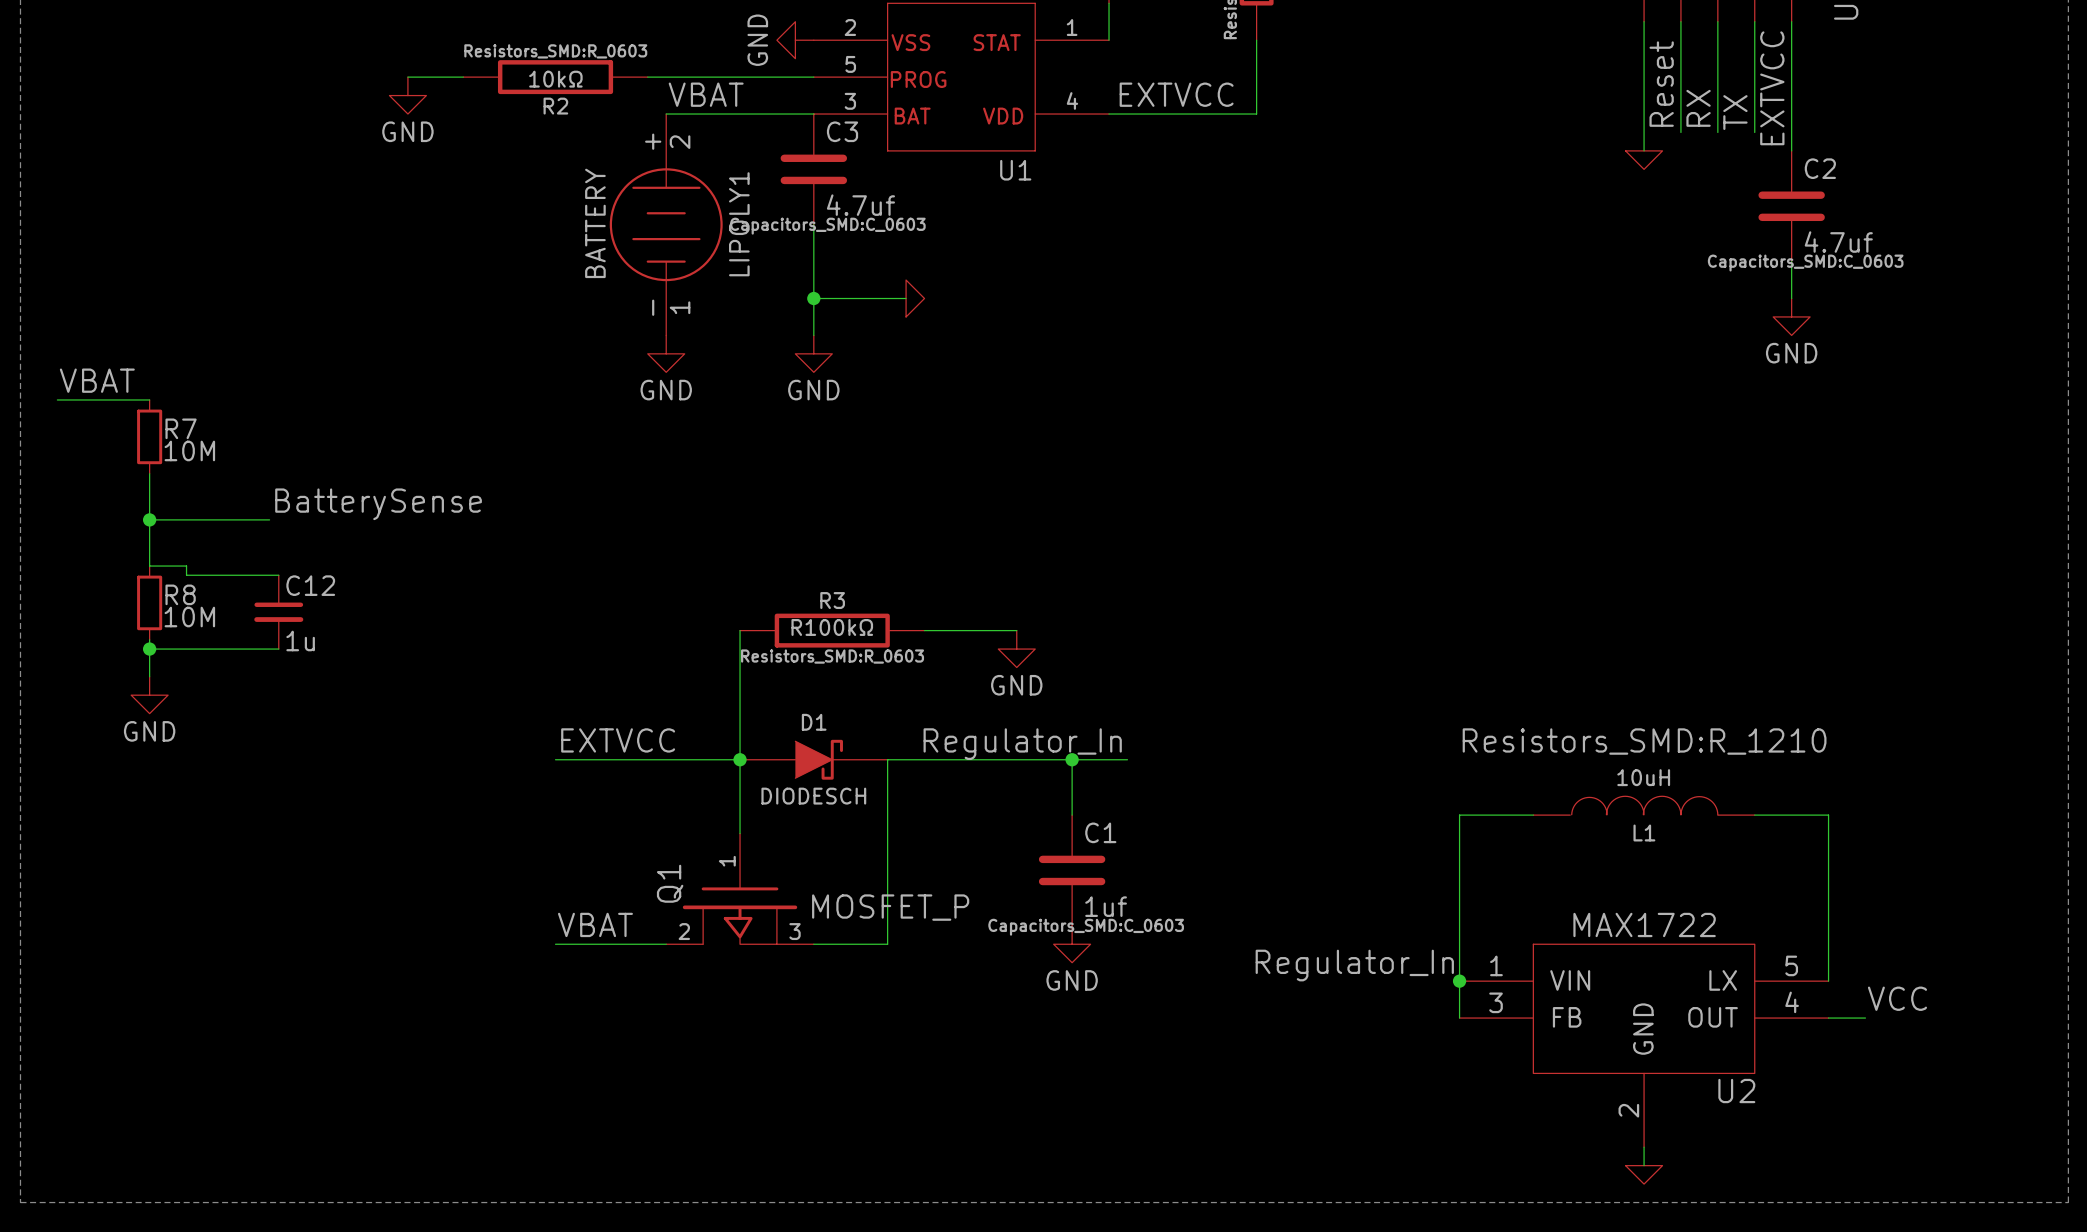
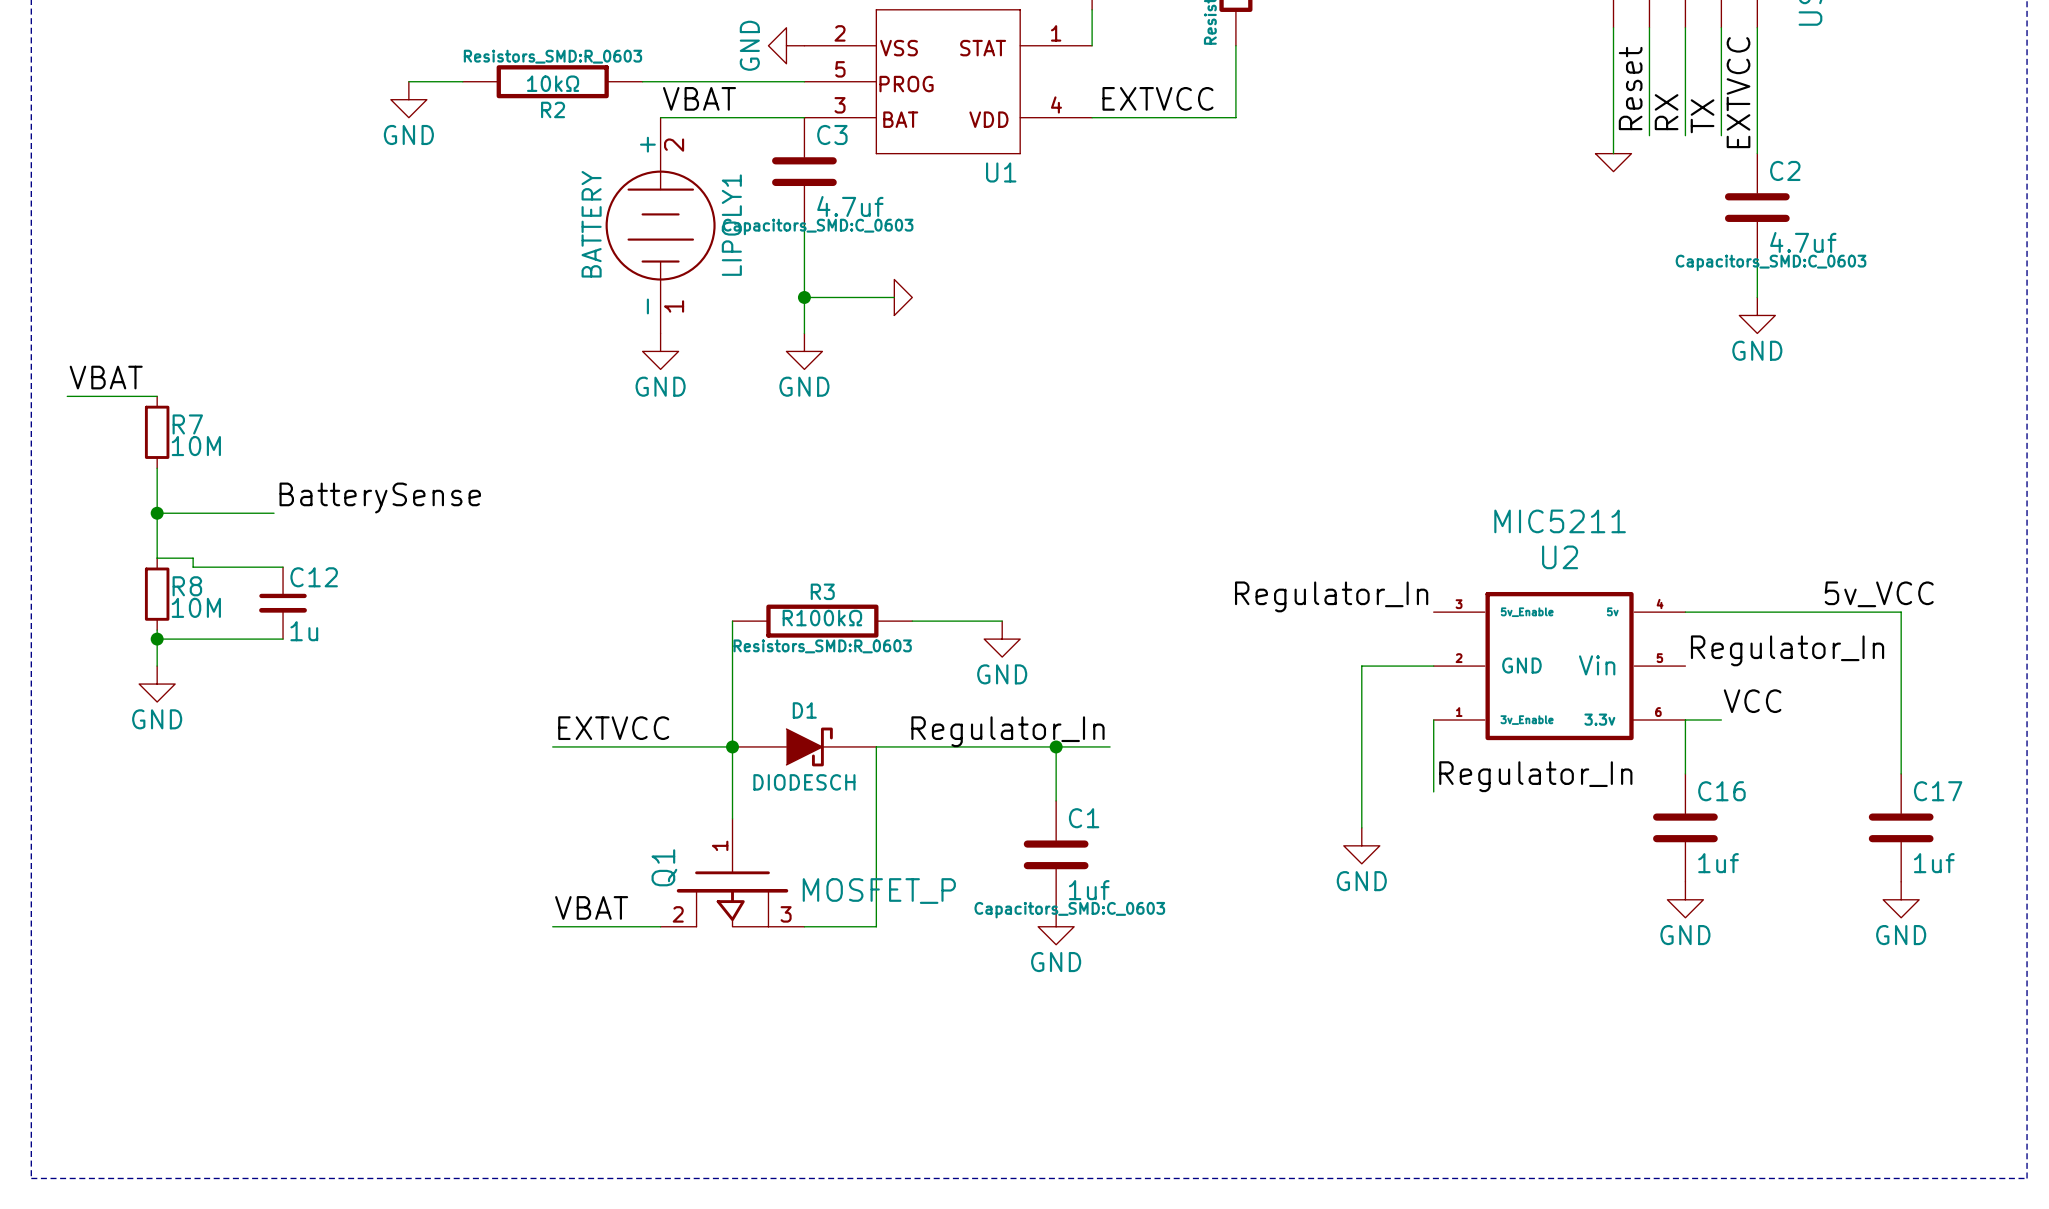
label: none -> 5v_VCC (1879, 594)
label: none -> Regulator_In (1331, 596)
wire: none -> (1685, 612) (1901, 612) (1901, 773)
label: none -> Regulator_In (1787, 650)
wire: none -> (1433, 666) (1361, 666) (1361, 827)
wire: none -> (1433, 720) (1433, 791)
wire: none -> (1721, 720) (1685, 720) (1685, 773)
L1: 10uH (1644, 805) -> none
wire: (1533, 815) (1459, 815) (1459, 1018) -> none
wire: (1754, 815) (1828, 815) (1828, 981) -> none
C16: none -> 1uf (1685, 827)
C17: none -> 1uf (1901, 827)
power symbol: none -> GND (1361, 845)
power symbol: none -> GND (1685, 899)
power symbol: none -> GND (1901, 899)
U2 value: MAX1722 (1644, 924) -> MIC5211 (1560, 521)
U2 symbol: [1459, 944, 1829, 1148] -> [1433, 591, 1686, 741]
label position: Regulator_In (1354, 965) -> Regulator_In (1535, 776)
junction: (1459, 981) -> none
label position: VCC (1897, 998) -> VCC (1752, 701)
wire: (1828, 1018) (1865, 1018) -> none
U2 name position: U2 (1736, 1091) -> U2 (1560, 557)
wire: (1644, 1147) (1644, 1165) -> none
power symbol: (1644, 1174) -> none

